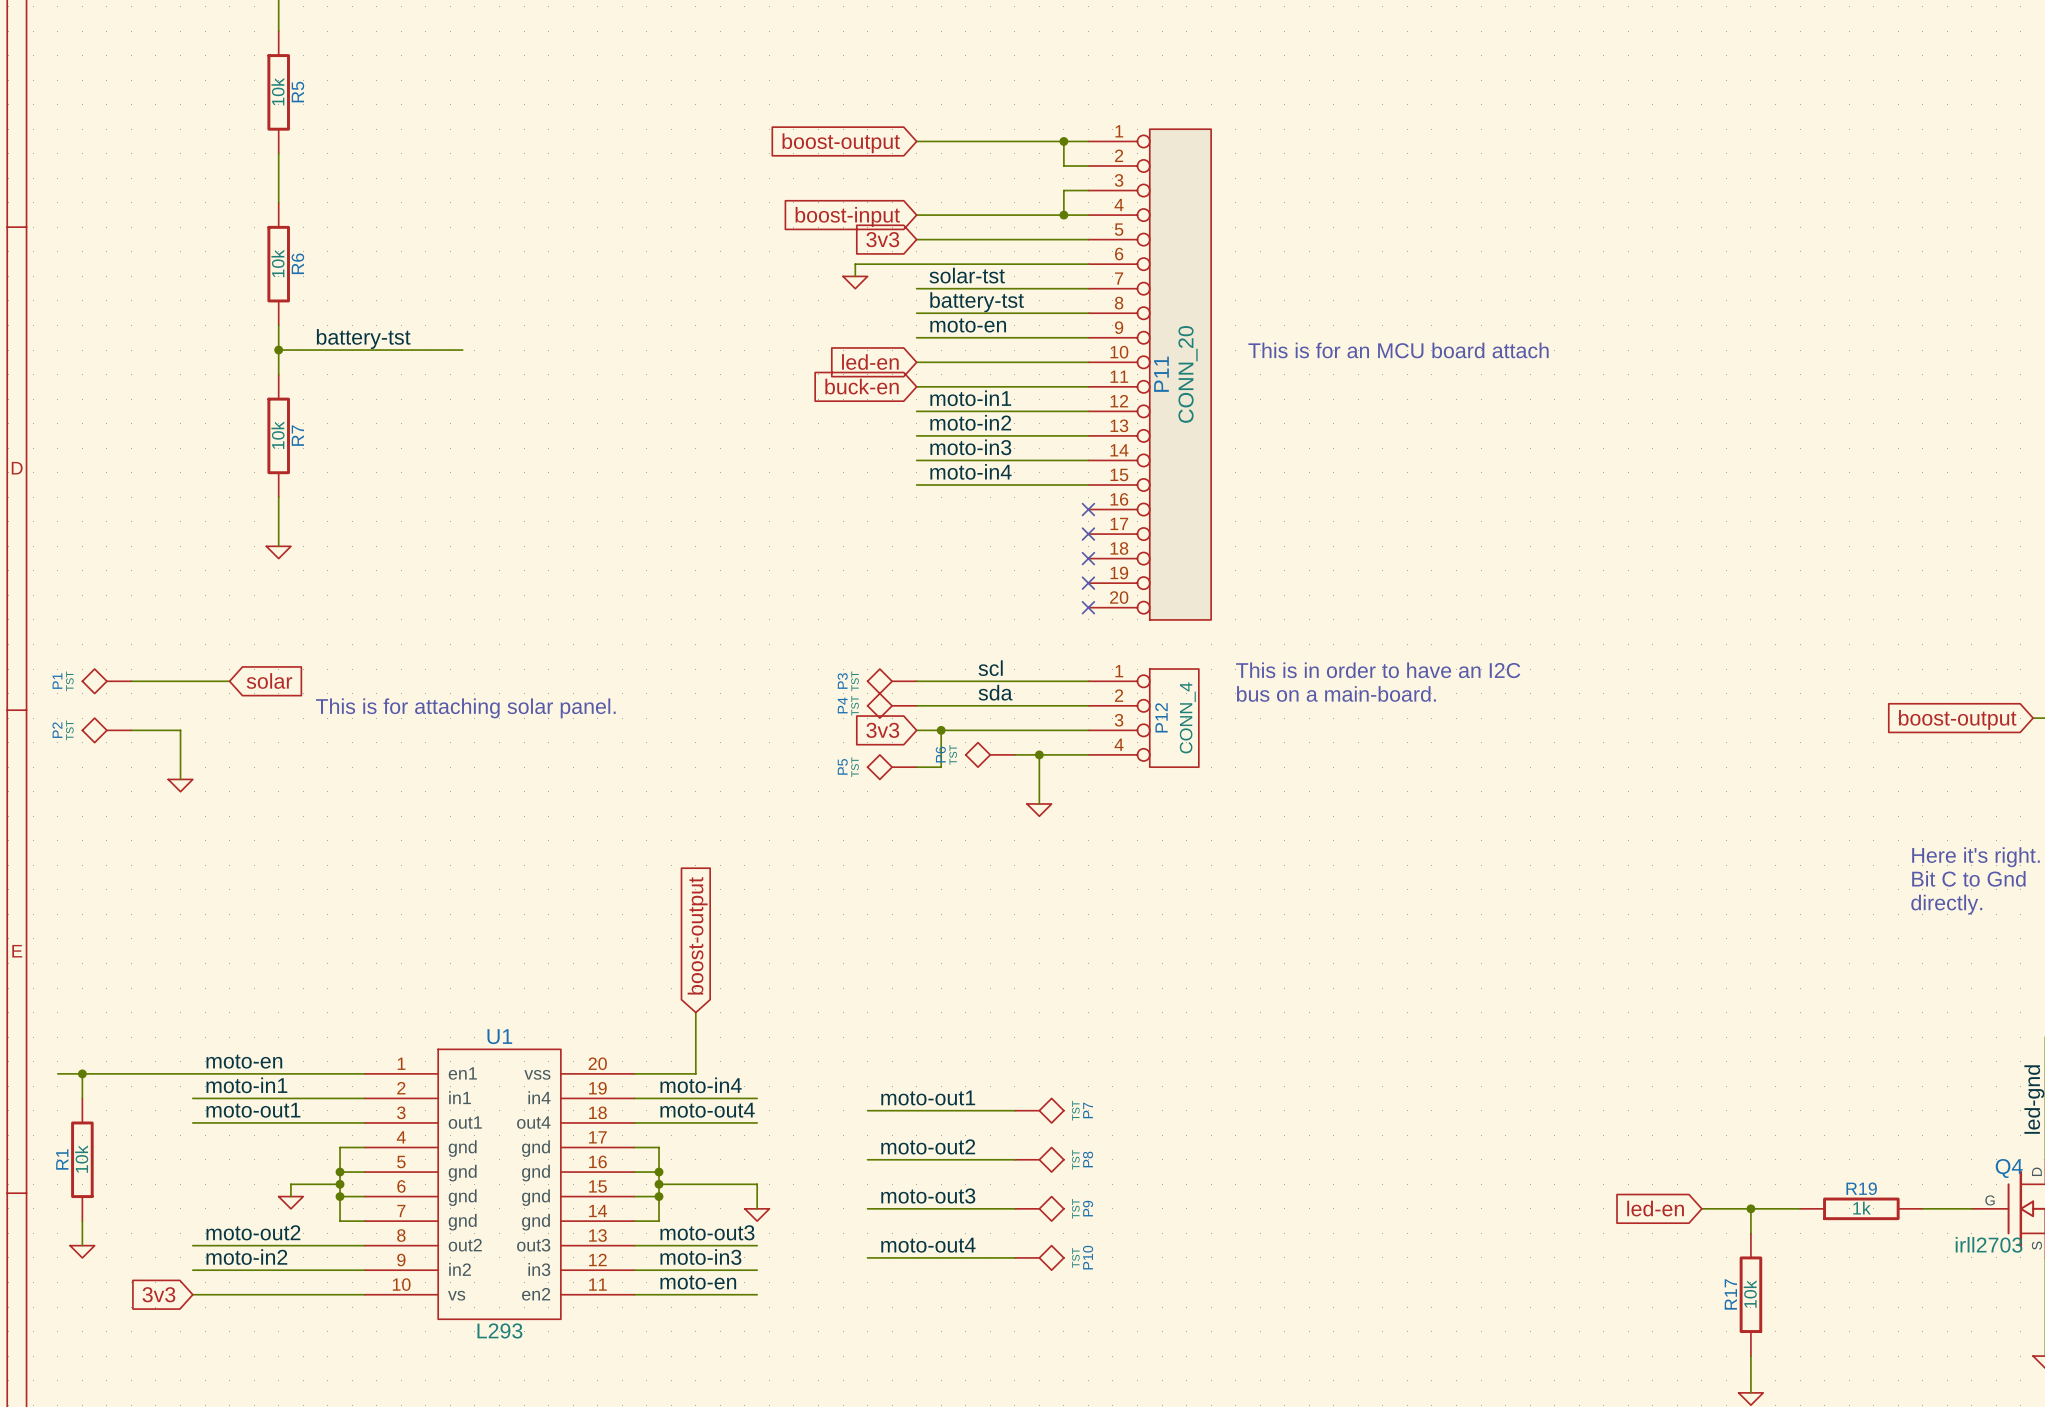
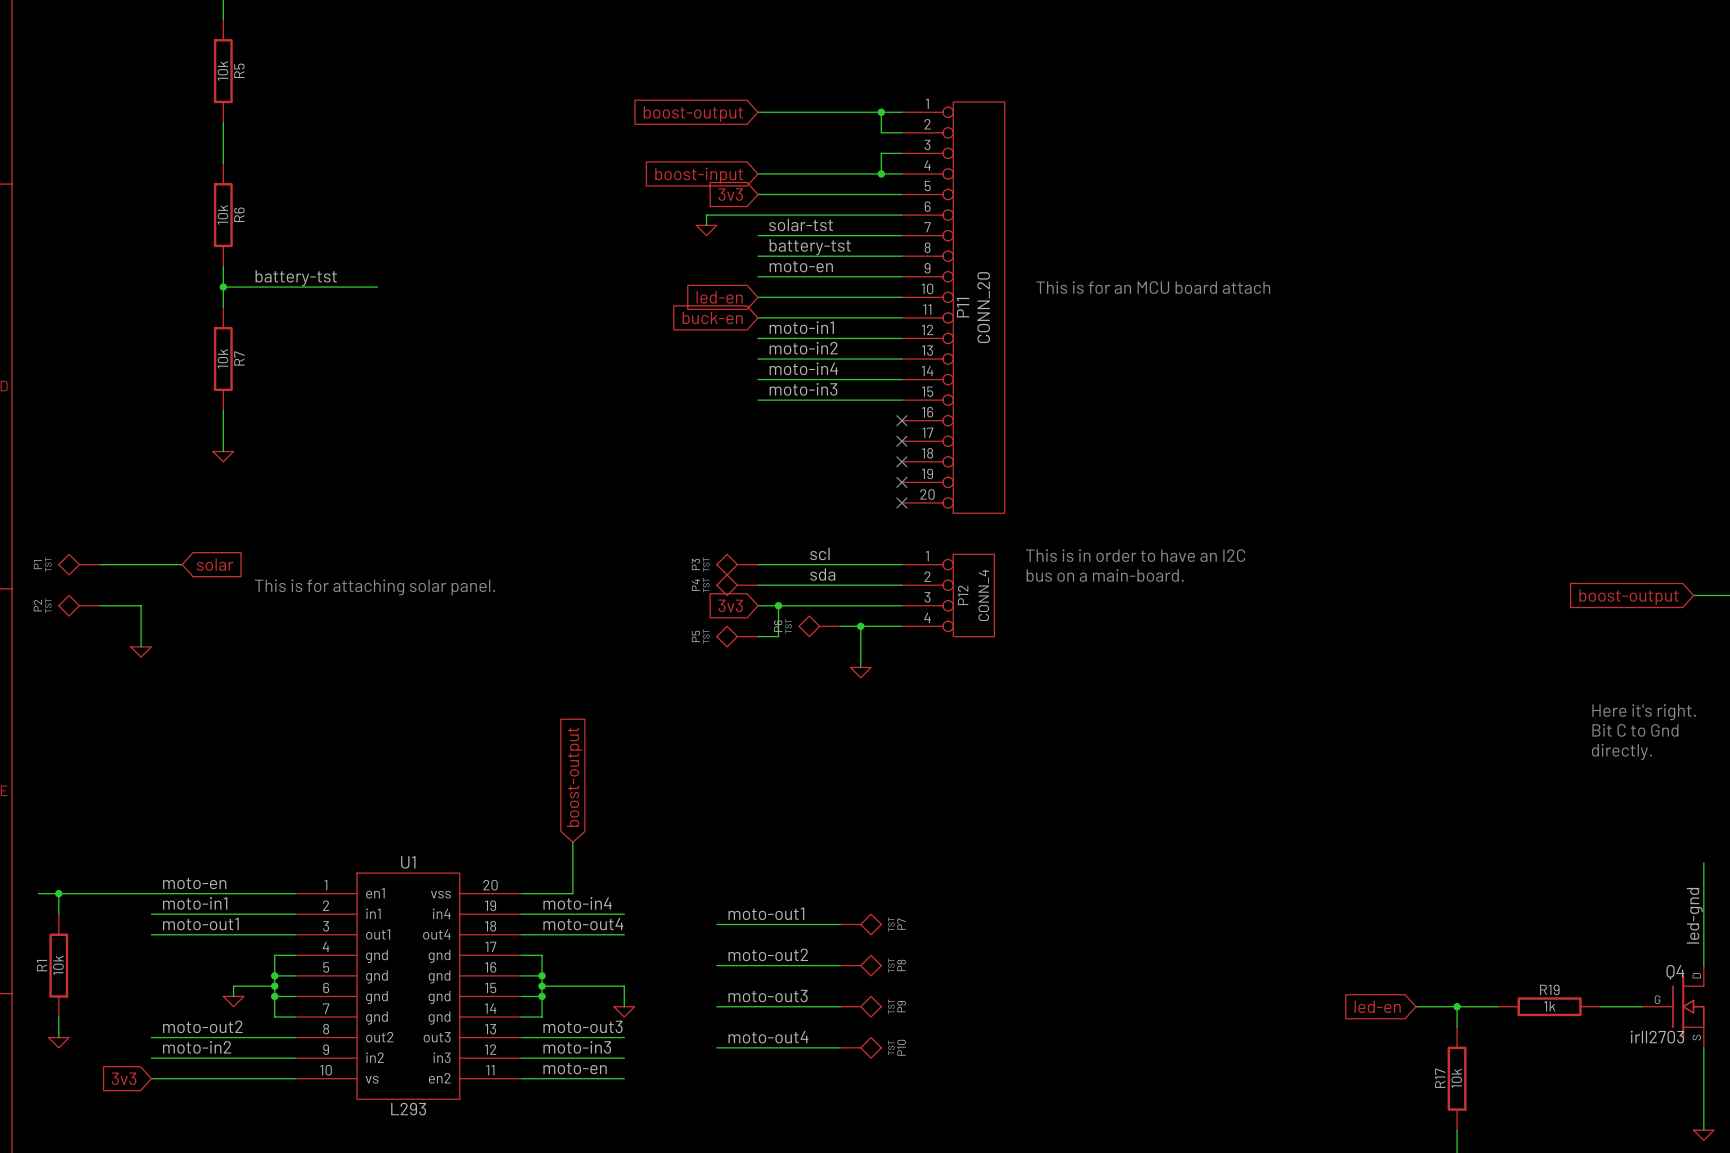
label: moto-in3 (970, 447) -> moto-in4 (803, 368)
label: moto-in4 (970, 471) -> moto-in3 (803, 389)

